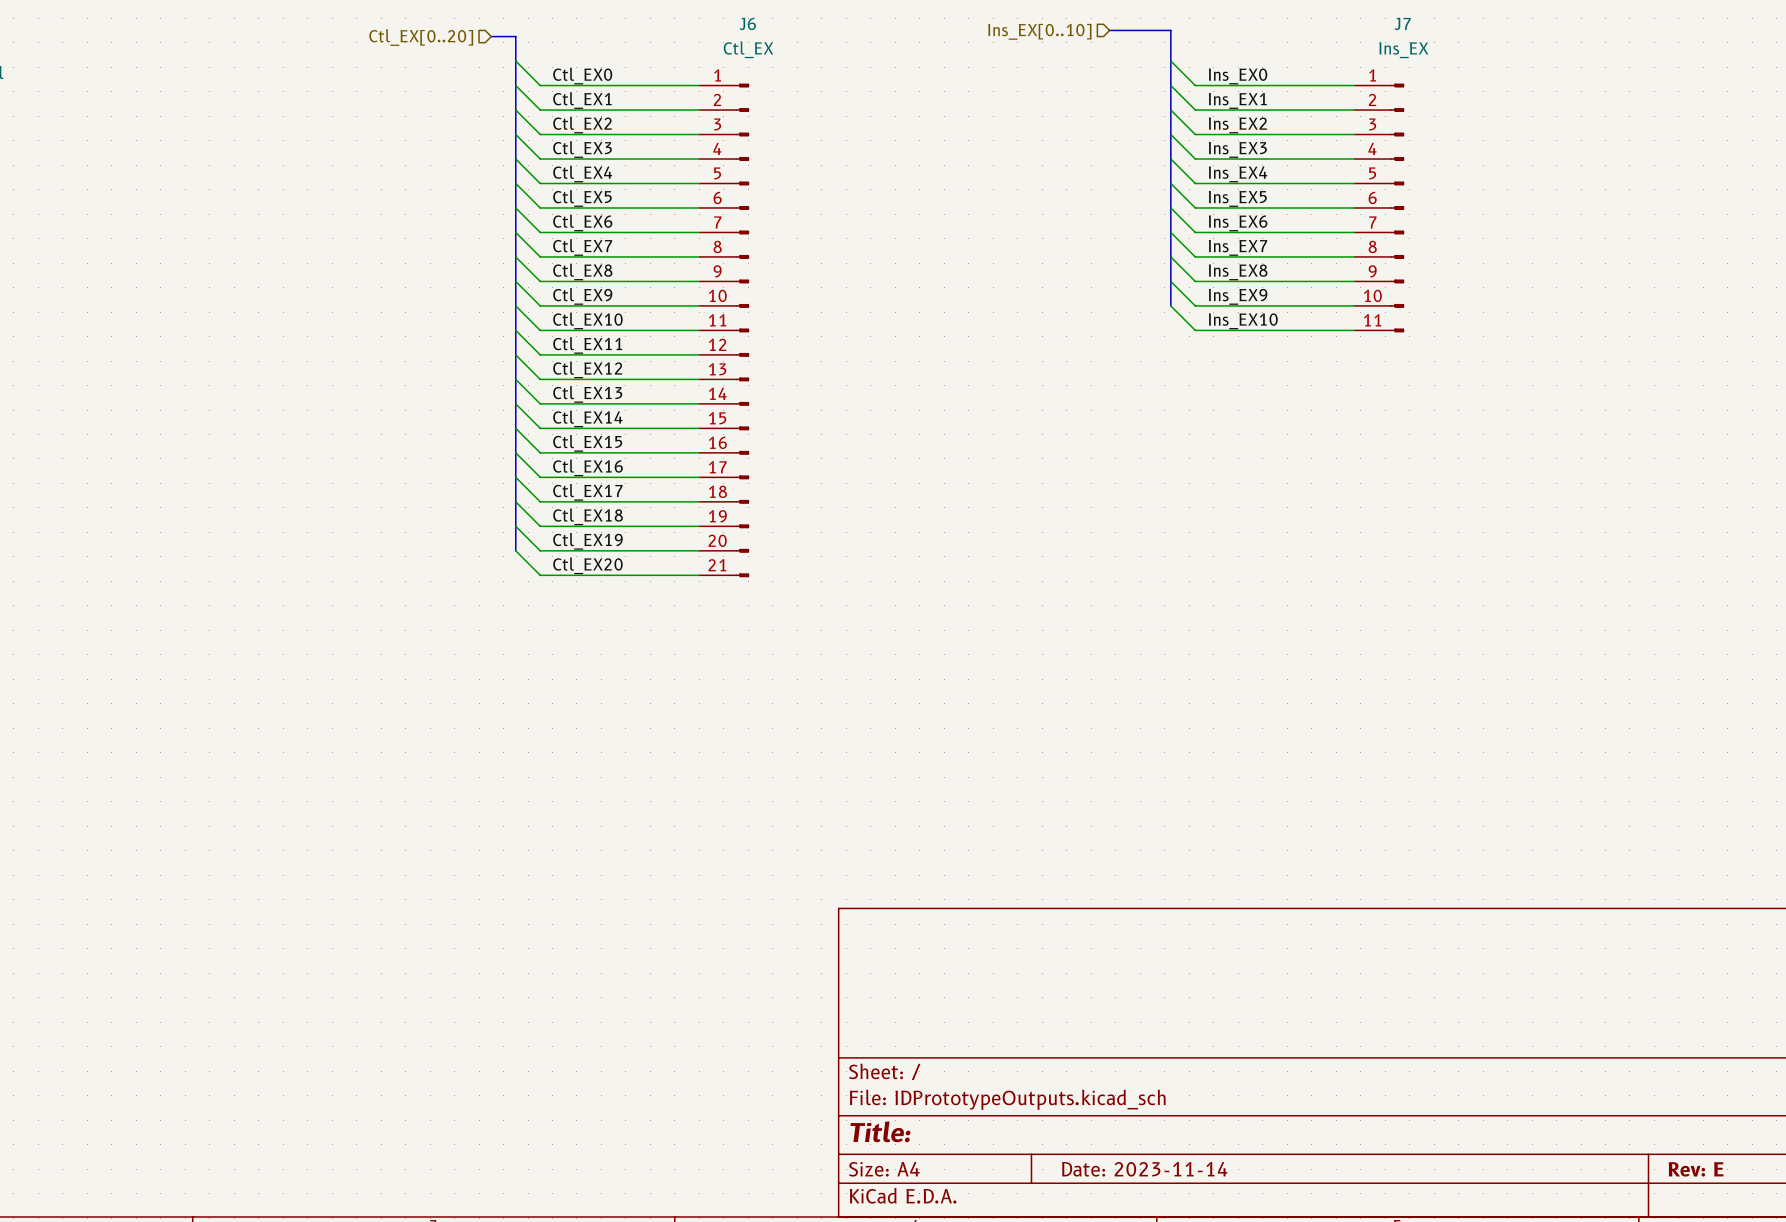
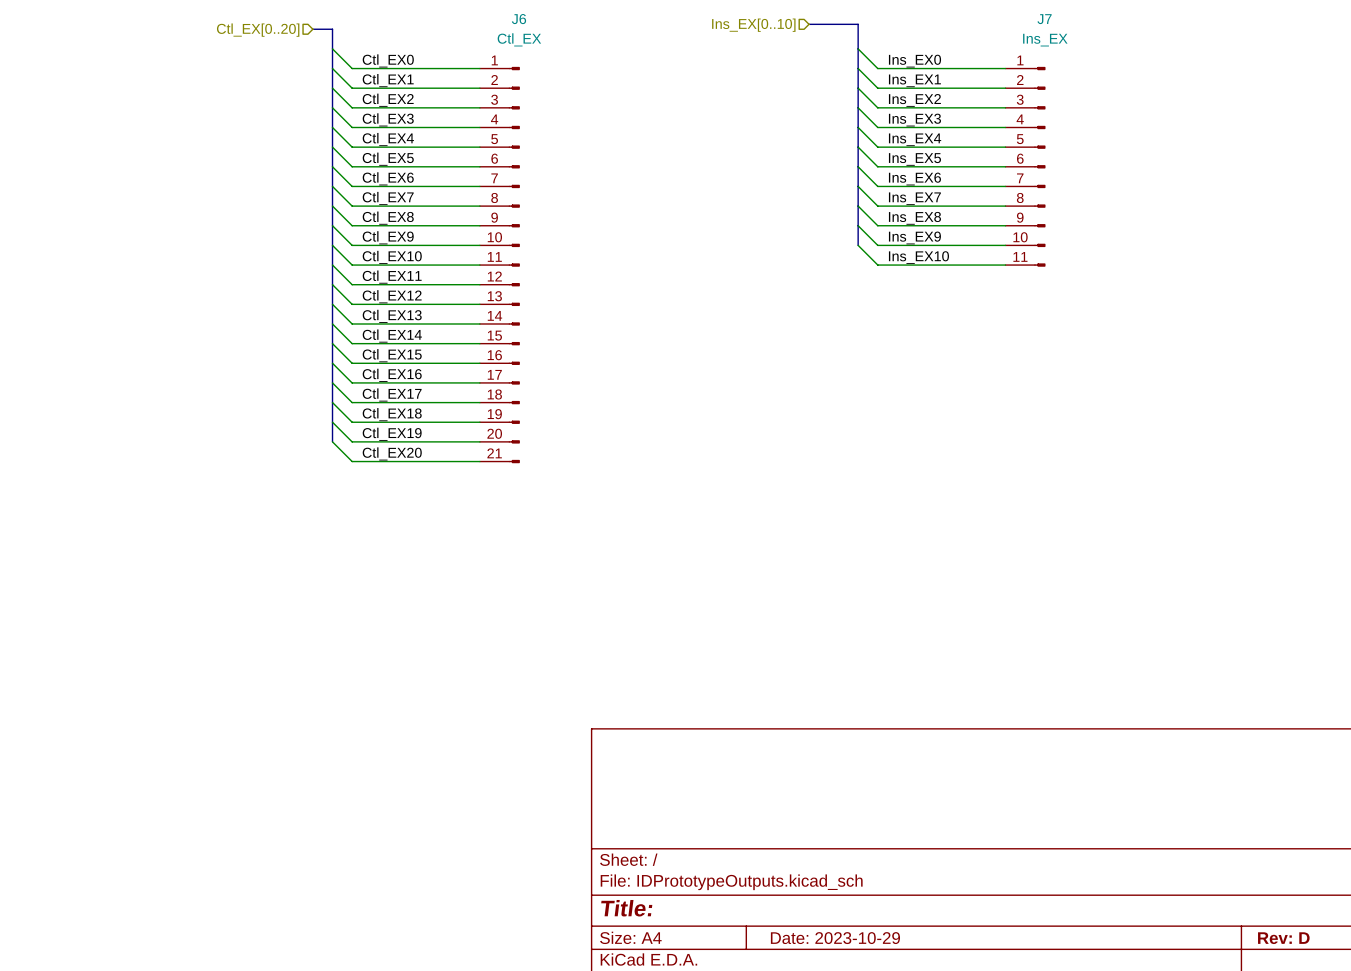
title block: Date: 2023-11-14 (1144, 1169) -> Date: 2023-10-29 (835, 938)
title block: Rev: E (1696, 1169) -> Rev: D (1283, 938)

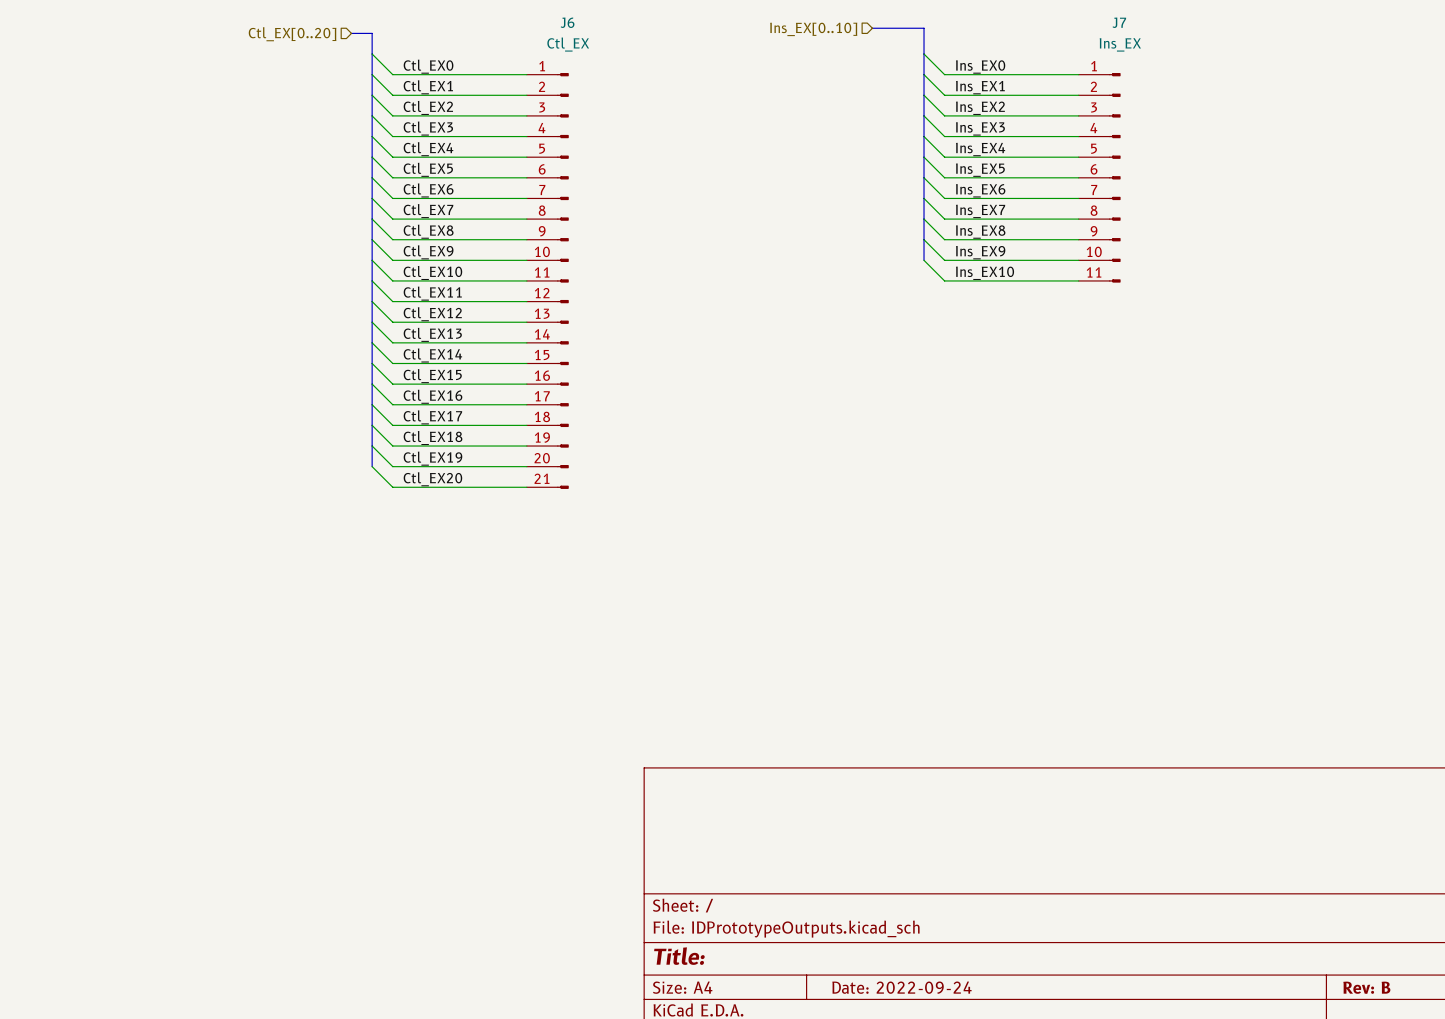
title block: Date: 2023-10-29 (835, 938) -> Date: 2022-09-24 (901, 987)
title block: Rev: D (1283, 938) -> Rev: B (1366, 987)

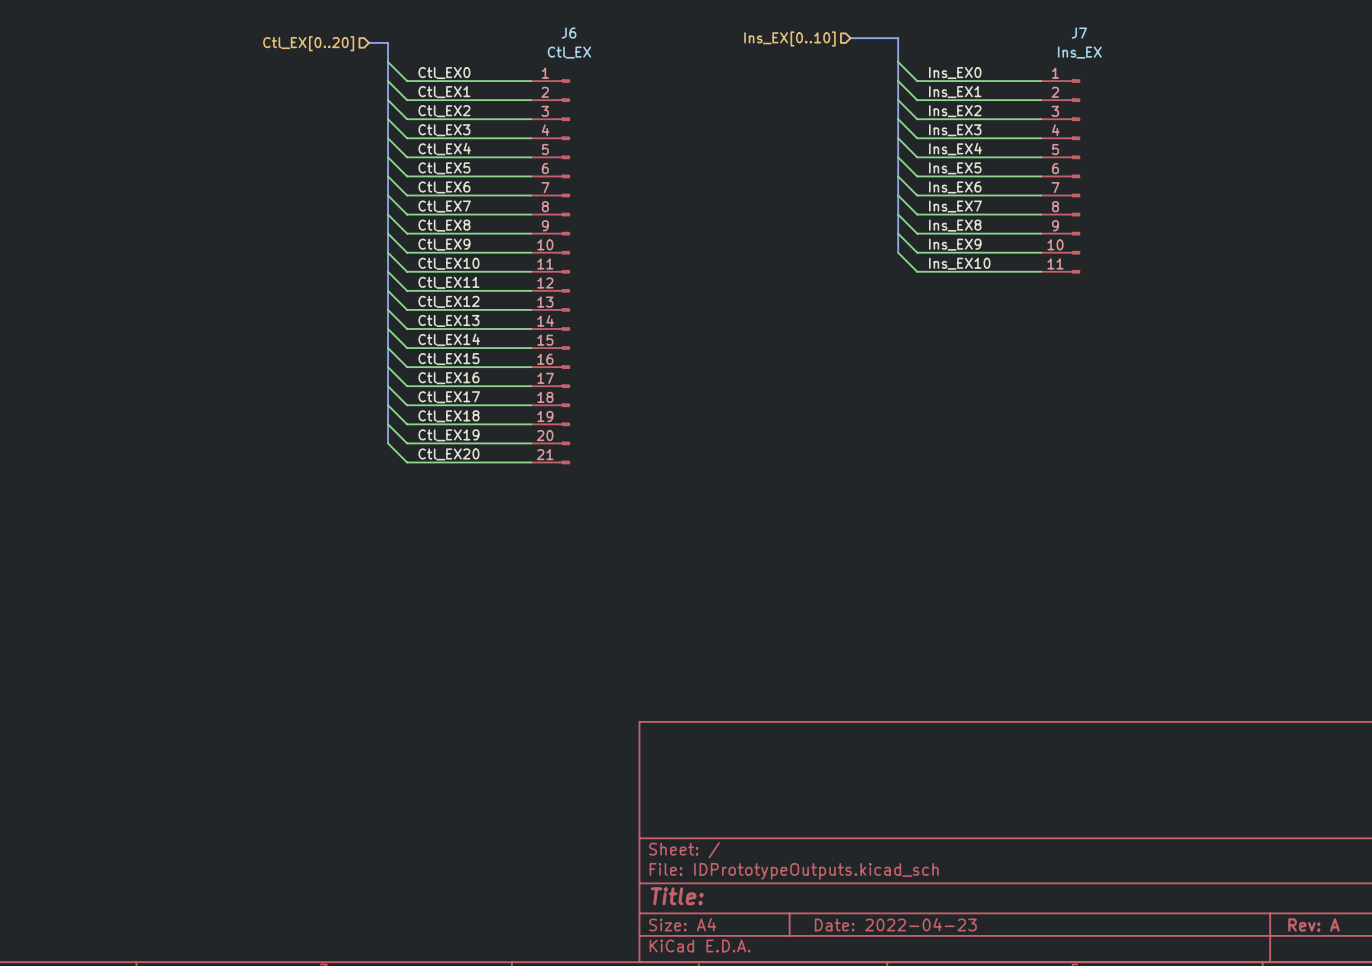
title block: Date: 2022-09-24 (901, 987) -> Date: 2022-04-23 (895, 924)
title block: Rev: B (1366, 987) -> Rev: A (1314, 924)

